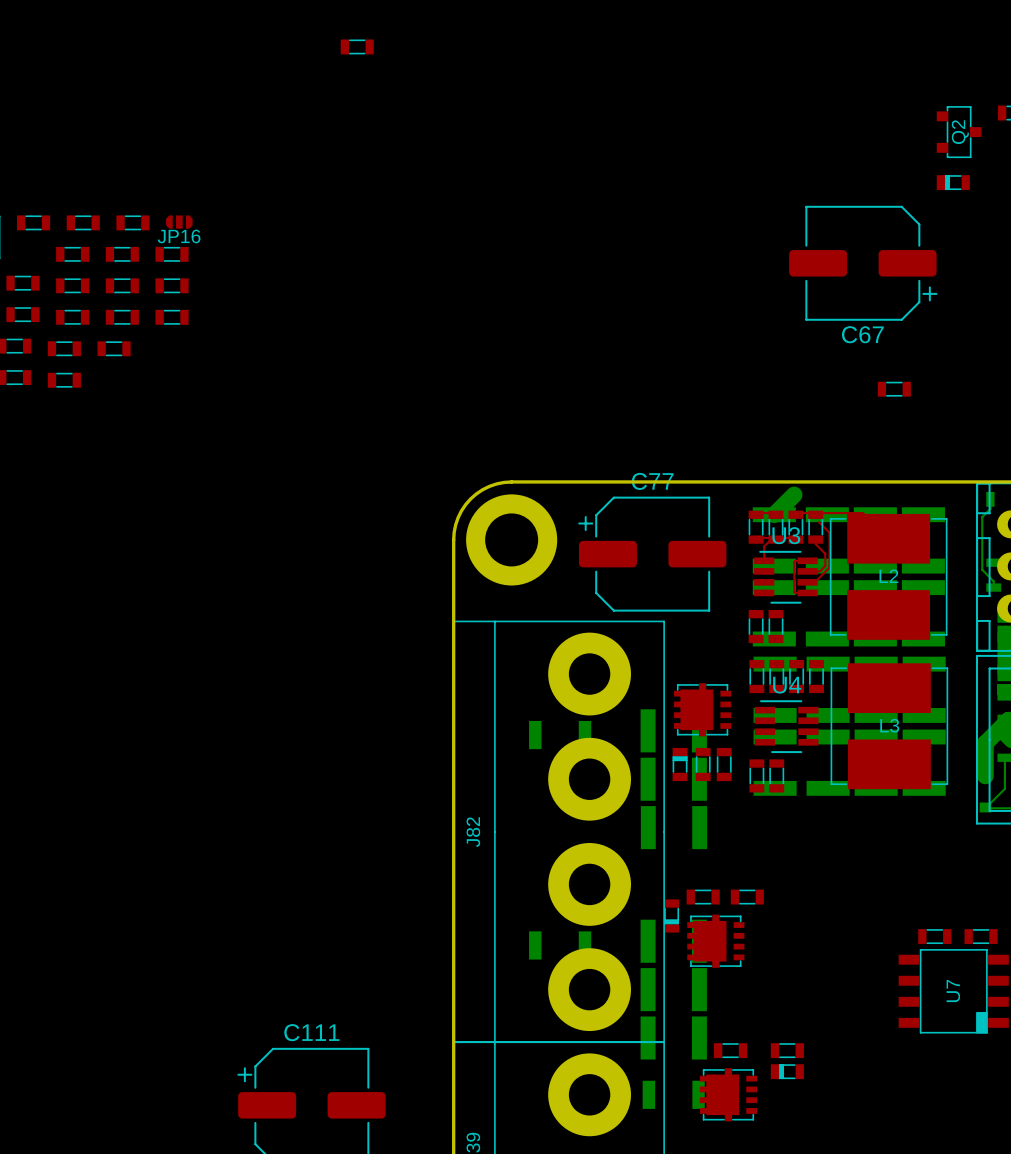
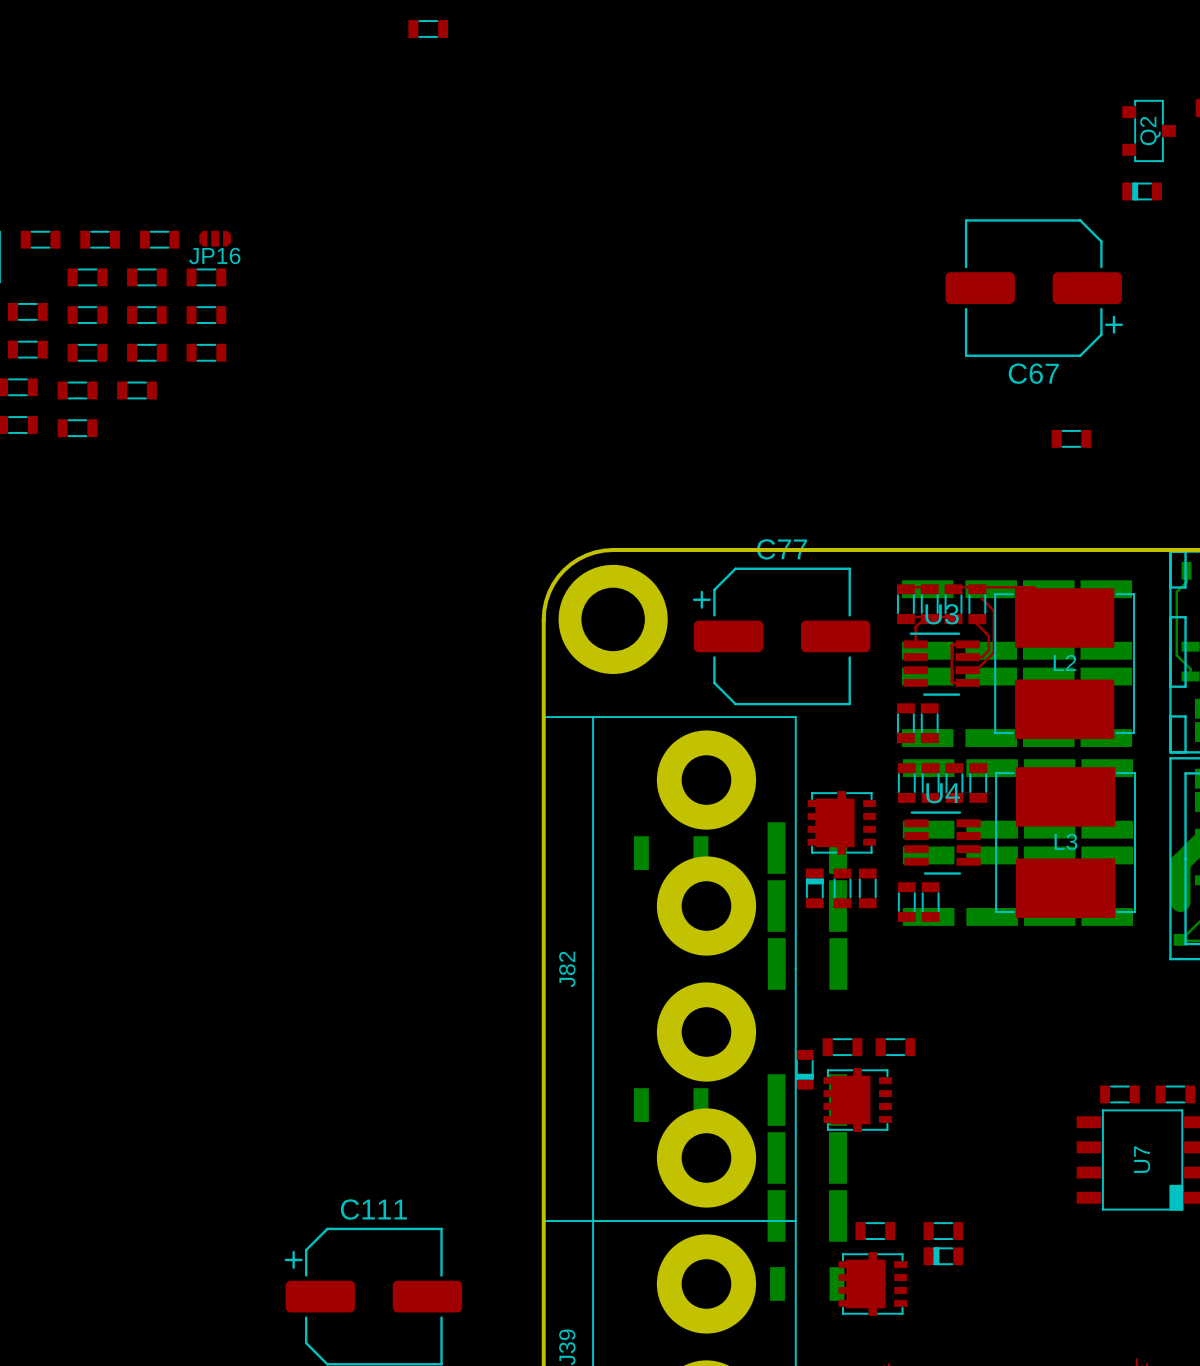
bottom track: (794, 494) (774, 514) -> none

